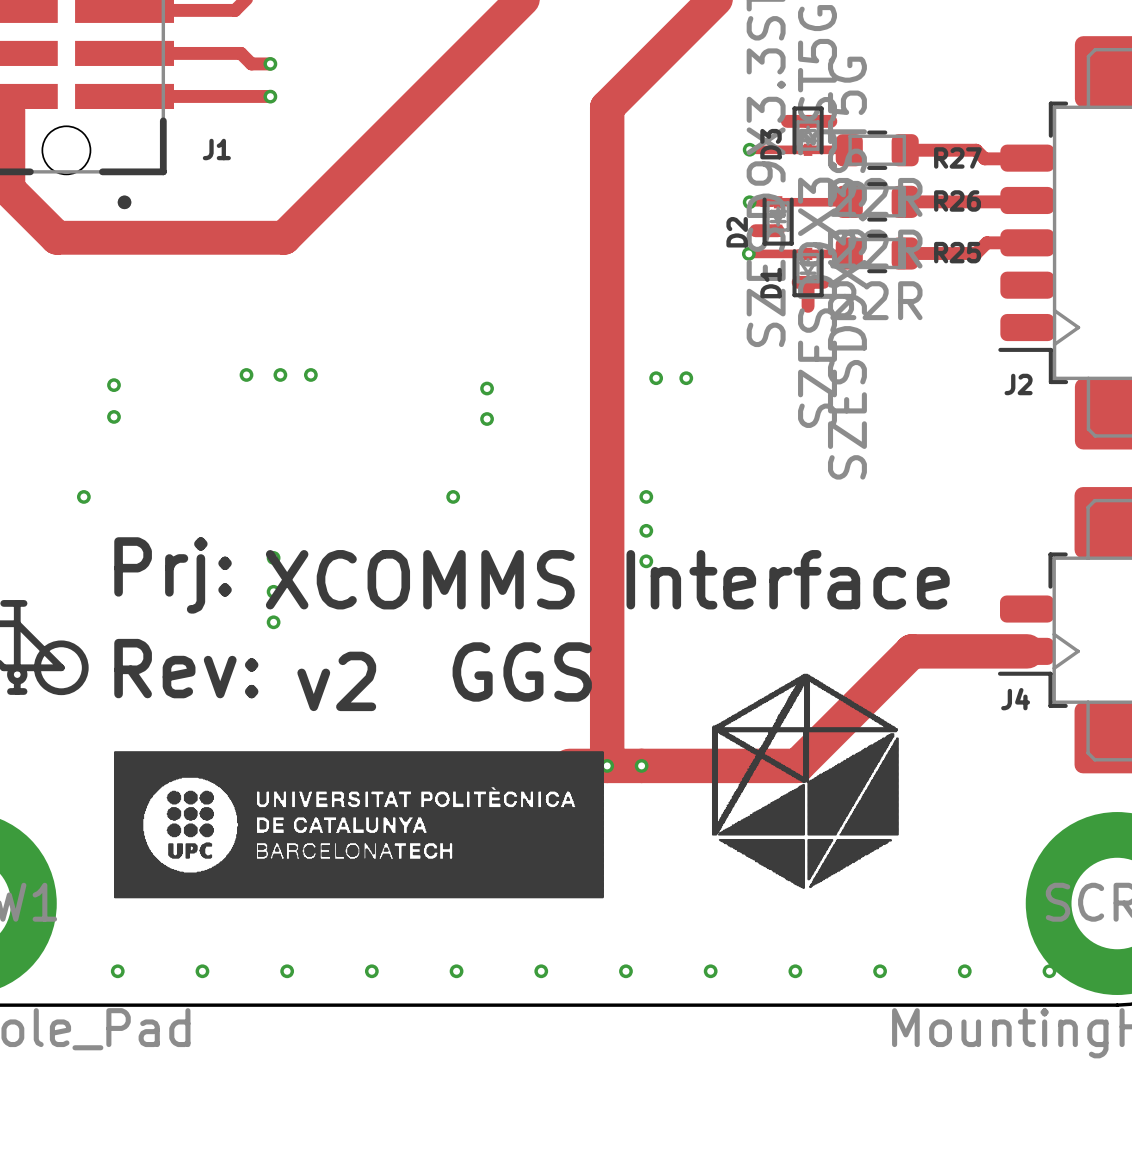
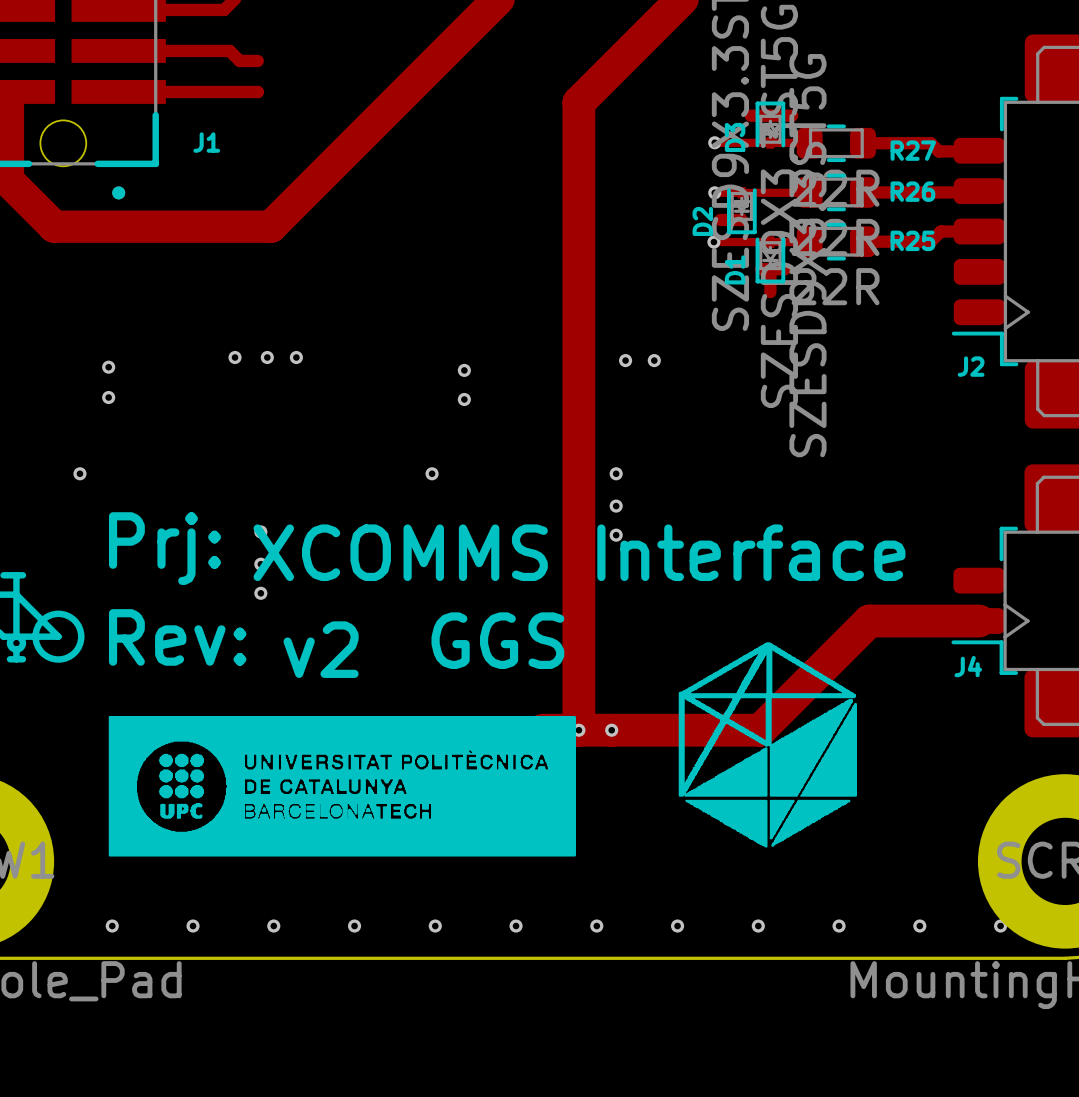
via: (270, 63) -> none
via: (270, 96) -> none

